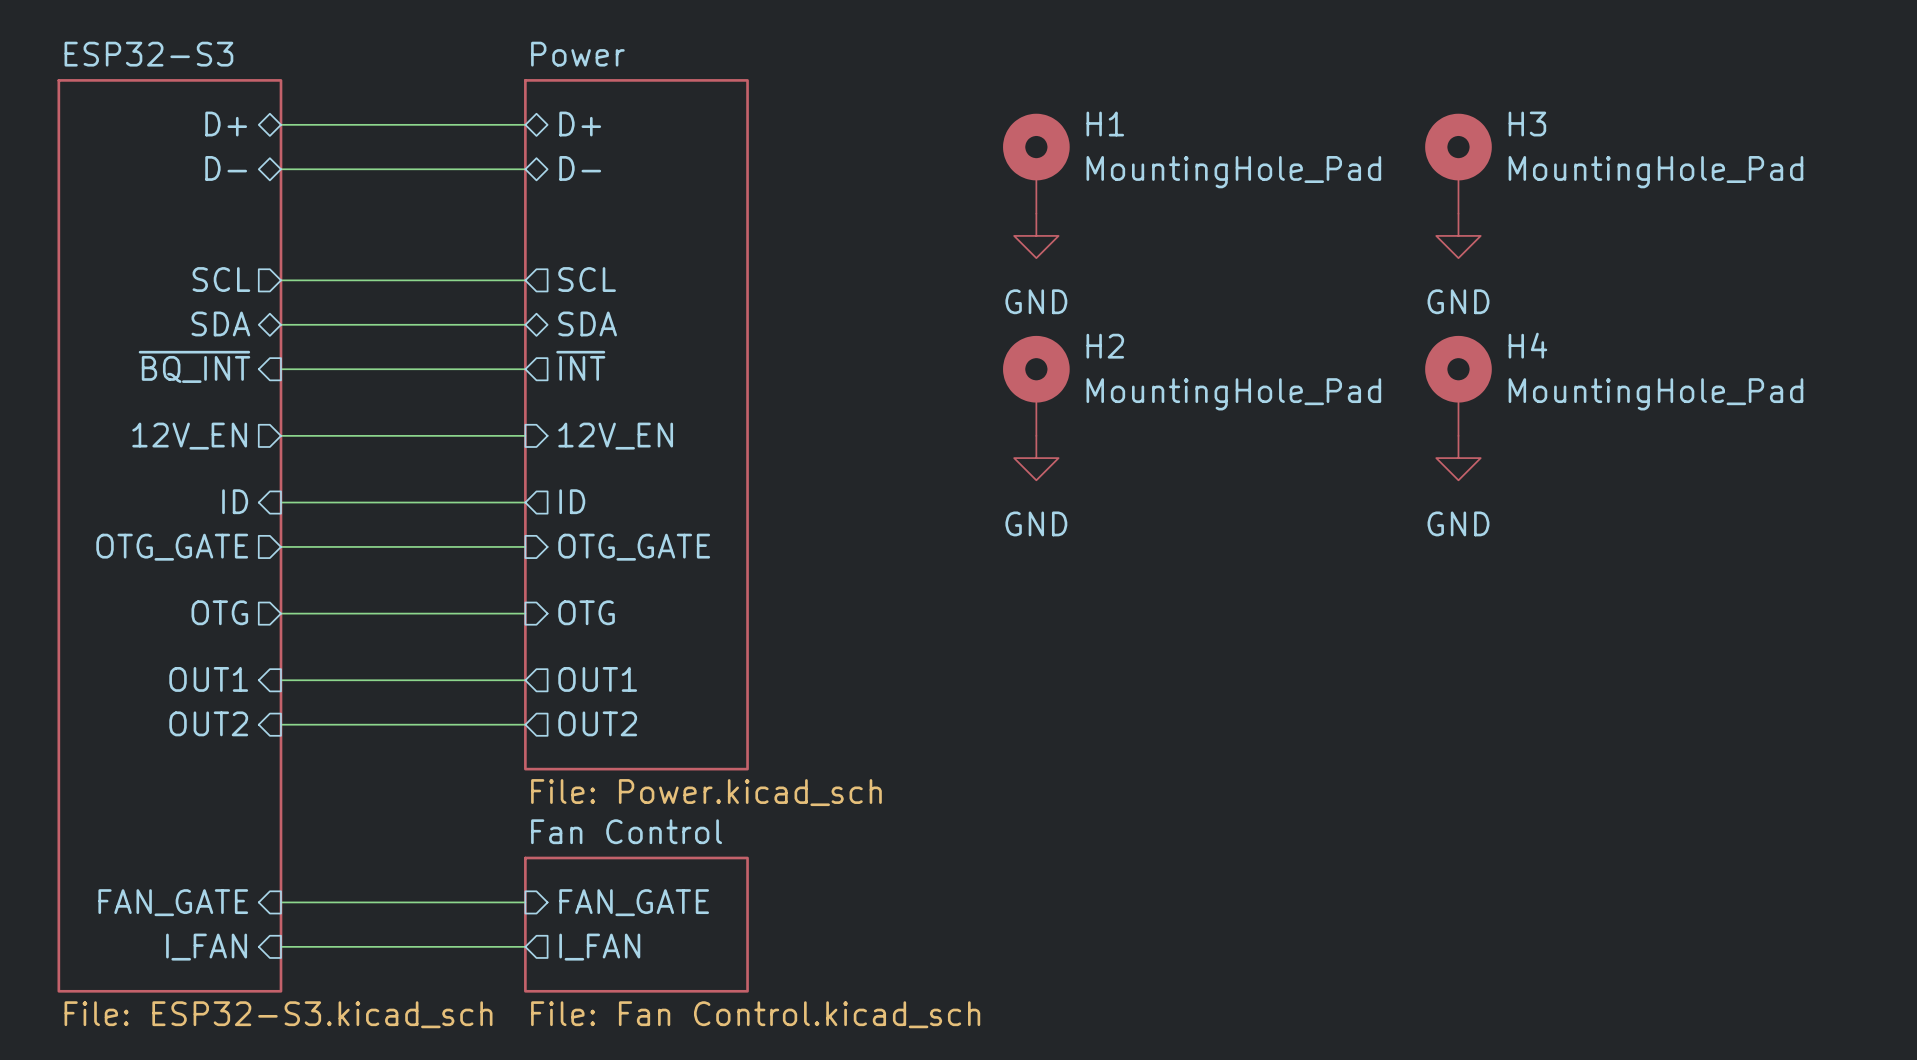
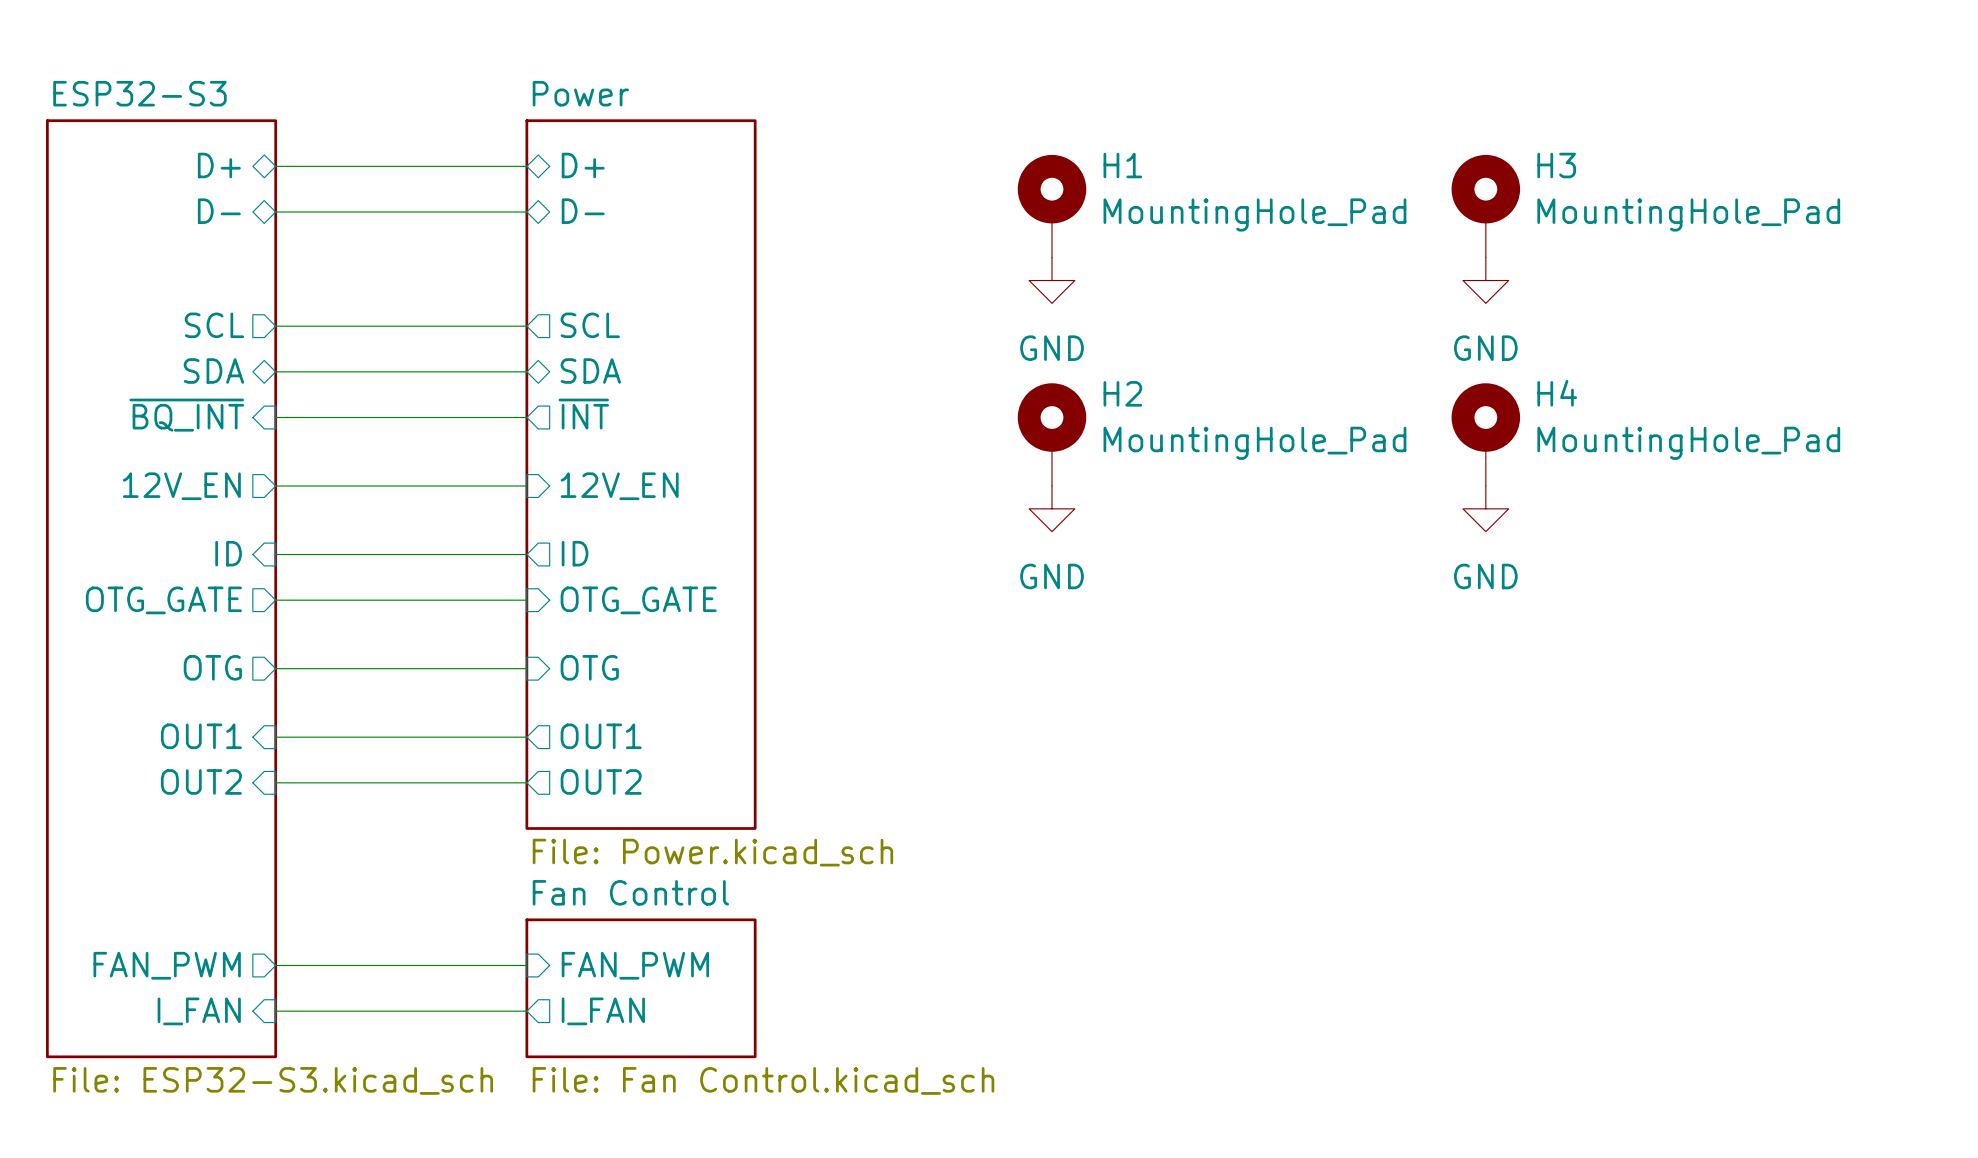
sheet pin shape: input (173, 902) -> output (167, 965)
sheet pin: FAN_GATE (173, 902) -> FAN_PWM (167, 965)
sheet pin: FAN_GATE (634, 902) -> FAN_PWM (635, 965)

